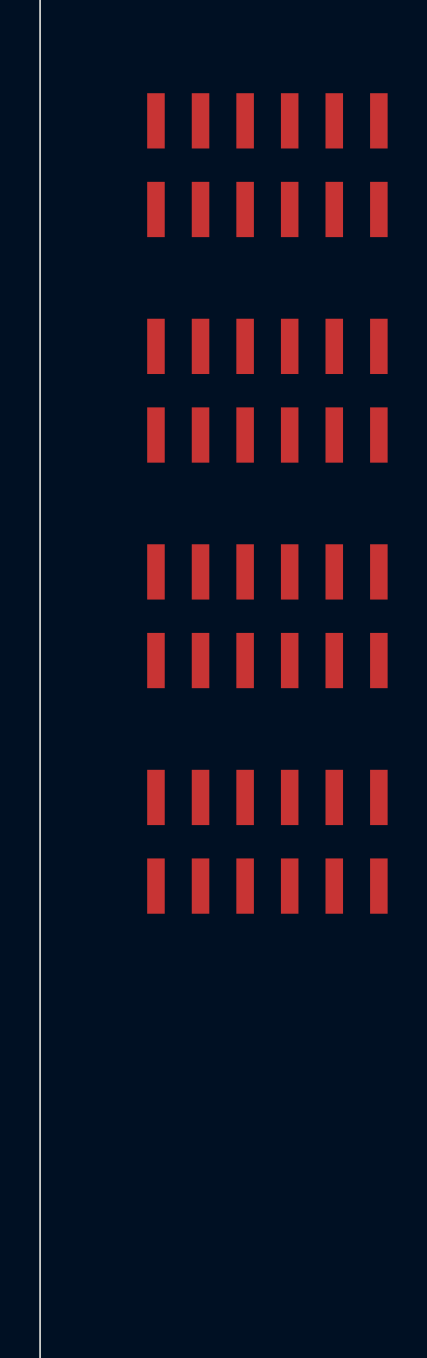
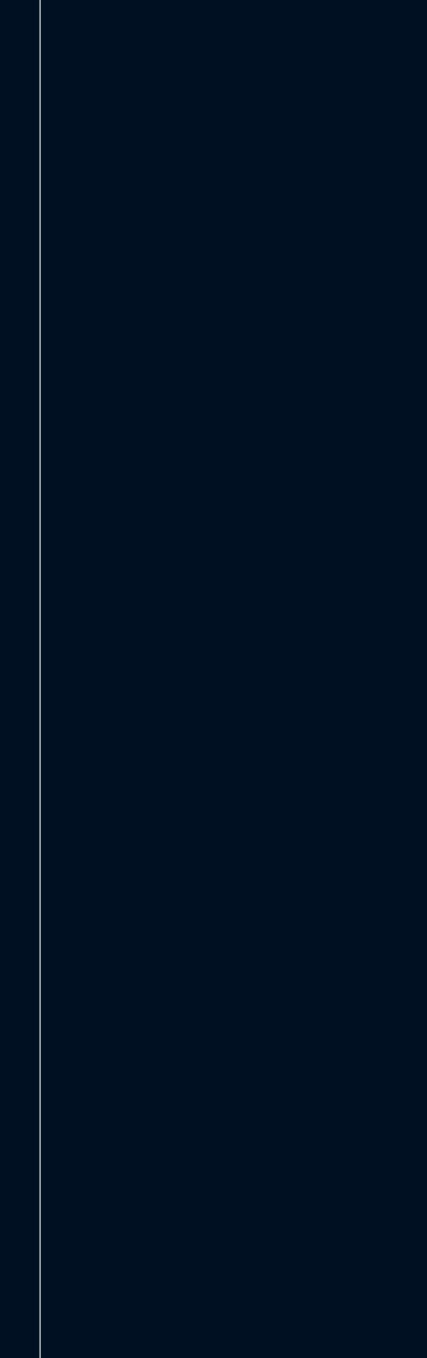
part: (267, 165) -> none
part: (267, 390) -> none
part: (267, 616) -> none
part: (267, 841) -> none

